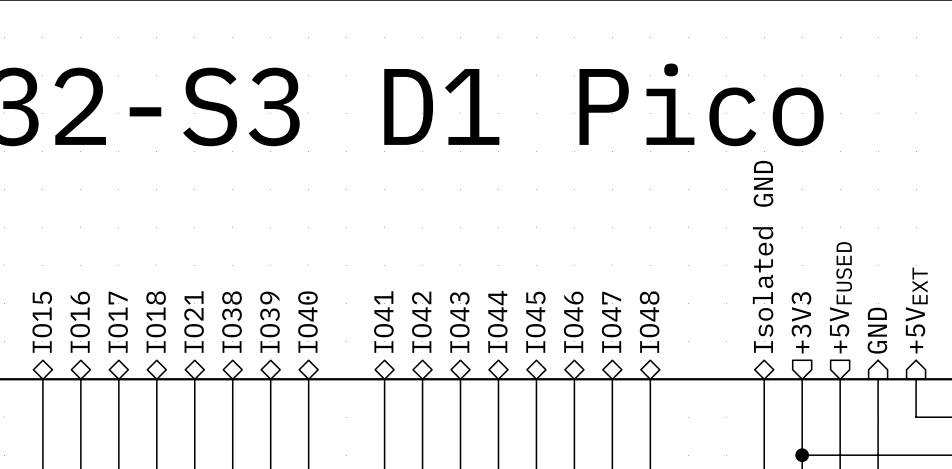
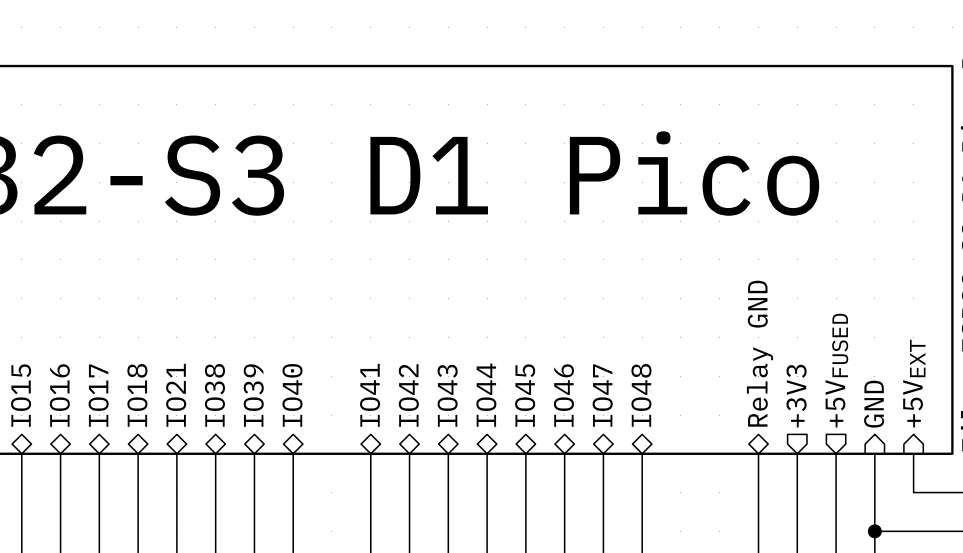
sheet pin: Isolated GND (763, 256) -> Relay GND (759, 353)
wire: (802, 455) (878, 455) -> none
junction: (802, 455) -> none
junction: none -> (874, 531)

